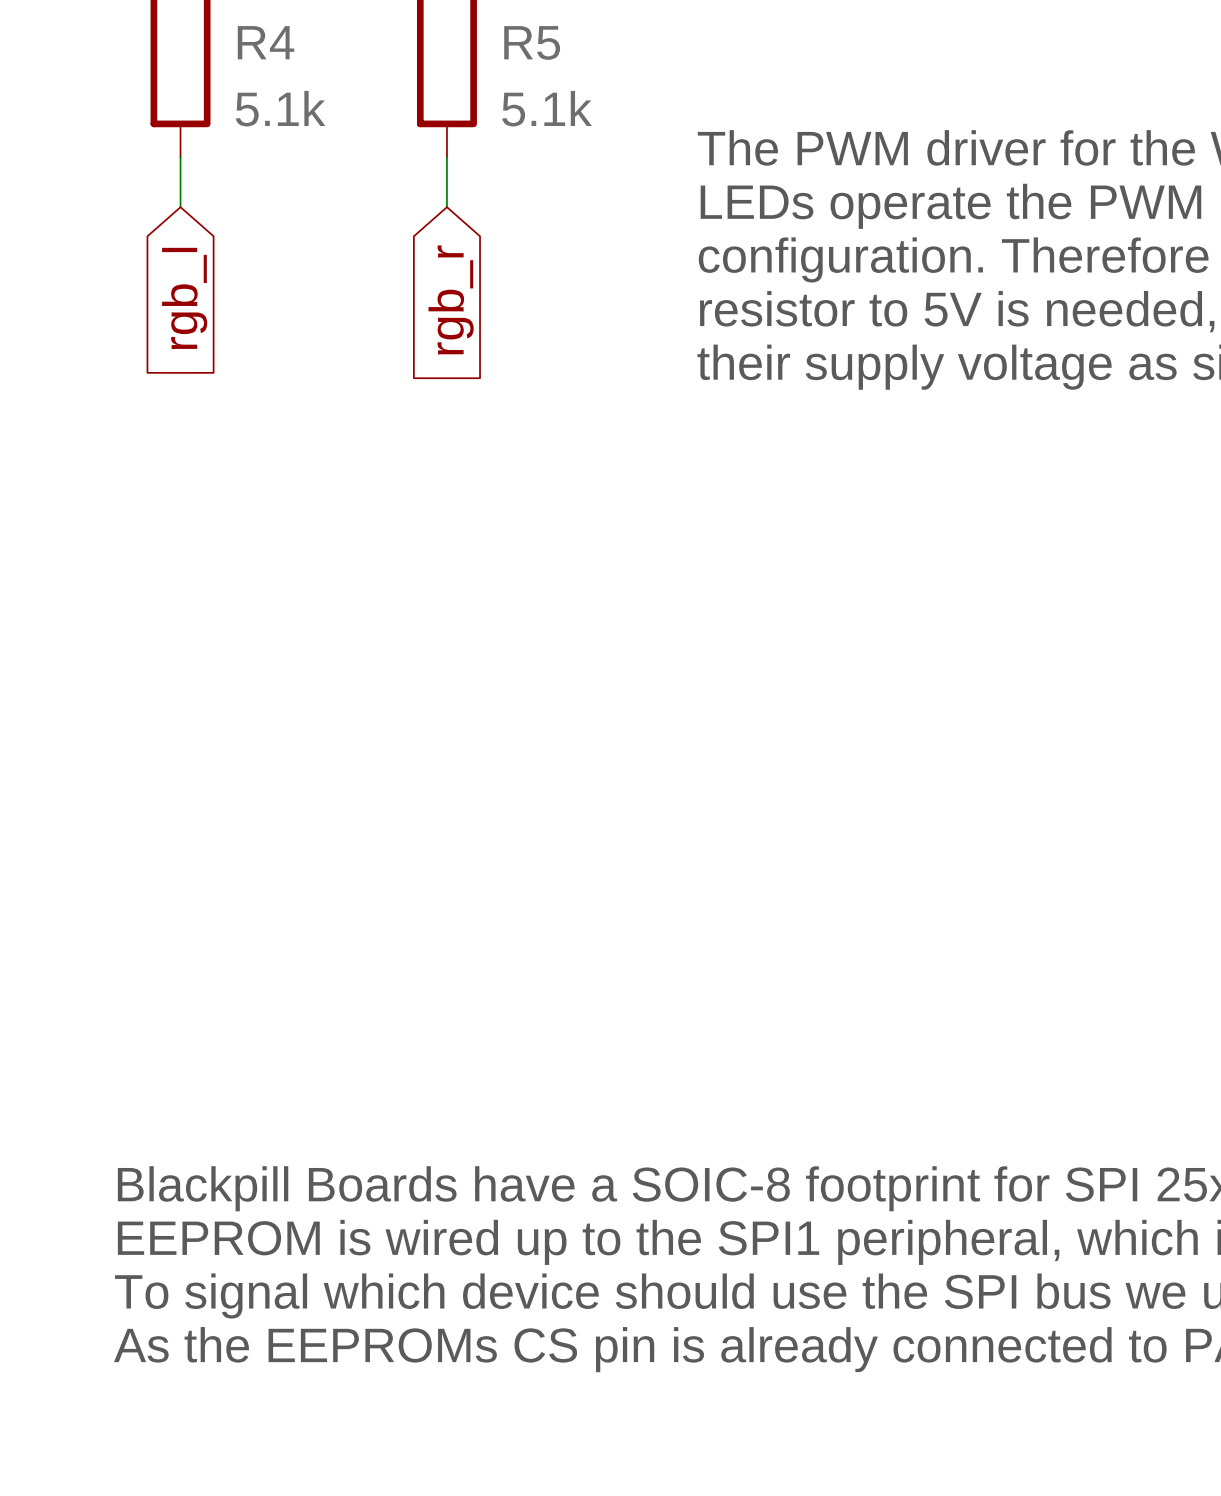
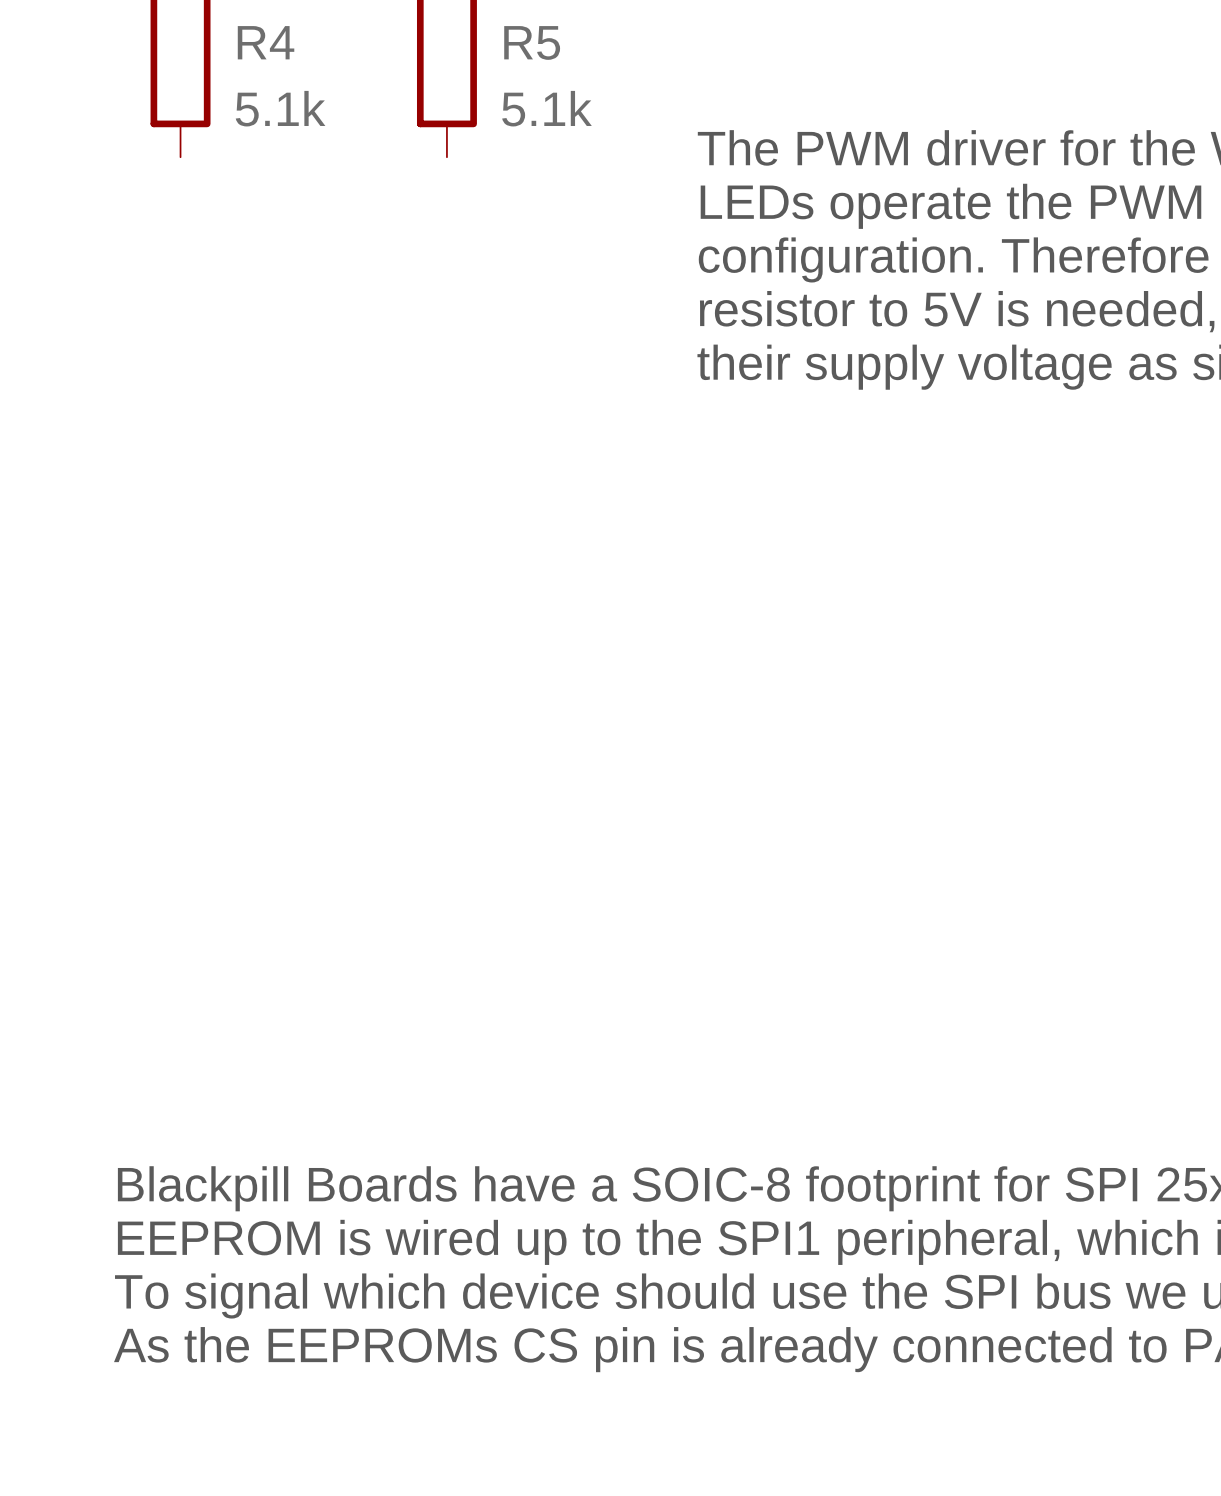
wire: (180, 157) (180, 207) -> none
wire: (446, 157) (446, 207) -> none
global label: rgb_l (184, 298) -> none
global label: rgb_r (451, 299) -> none

